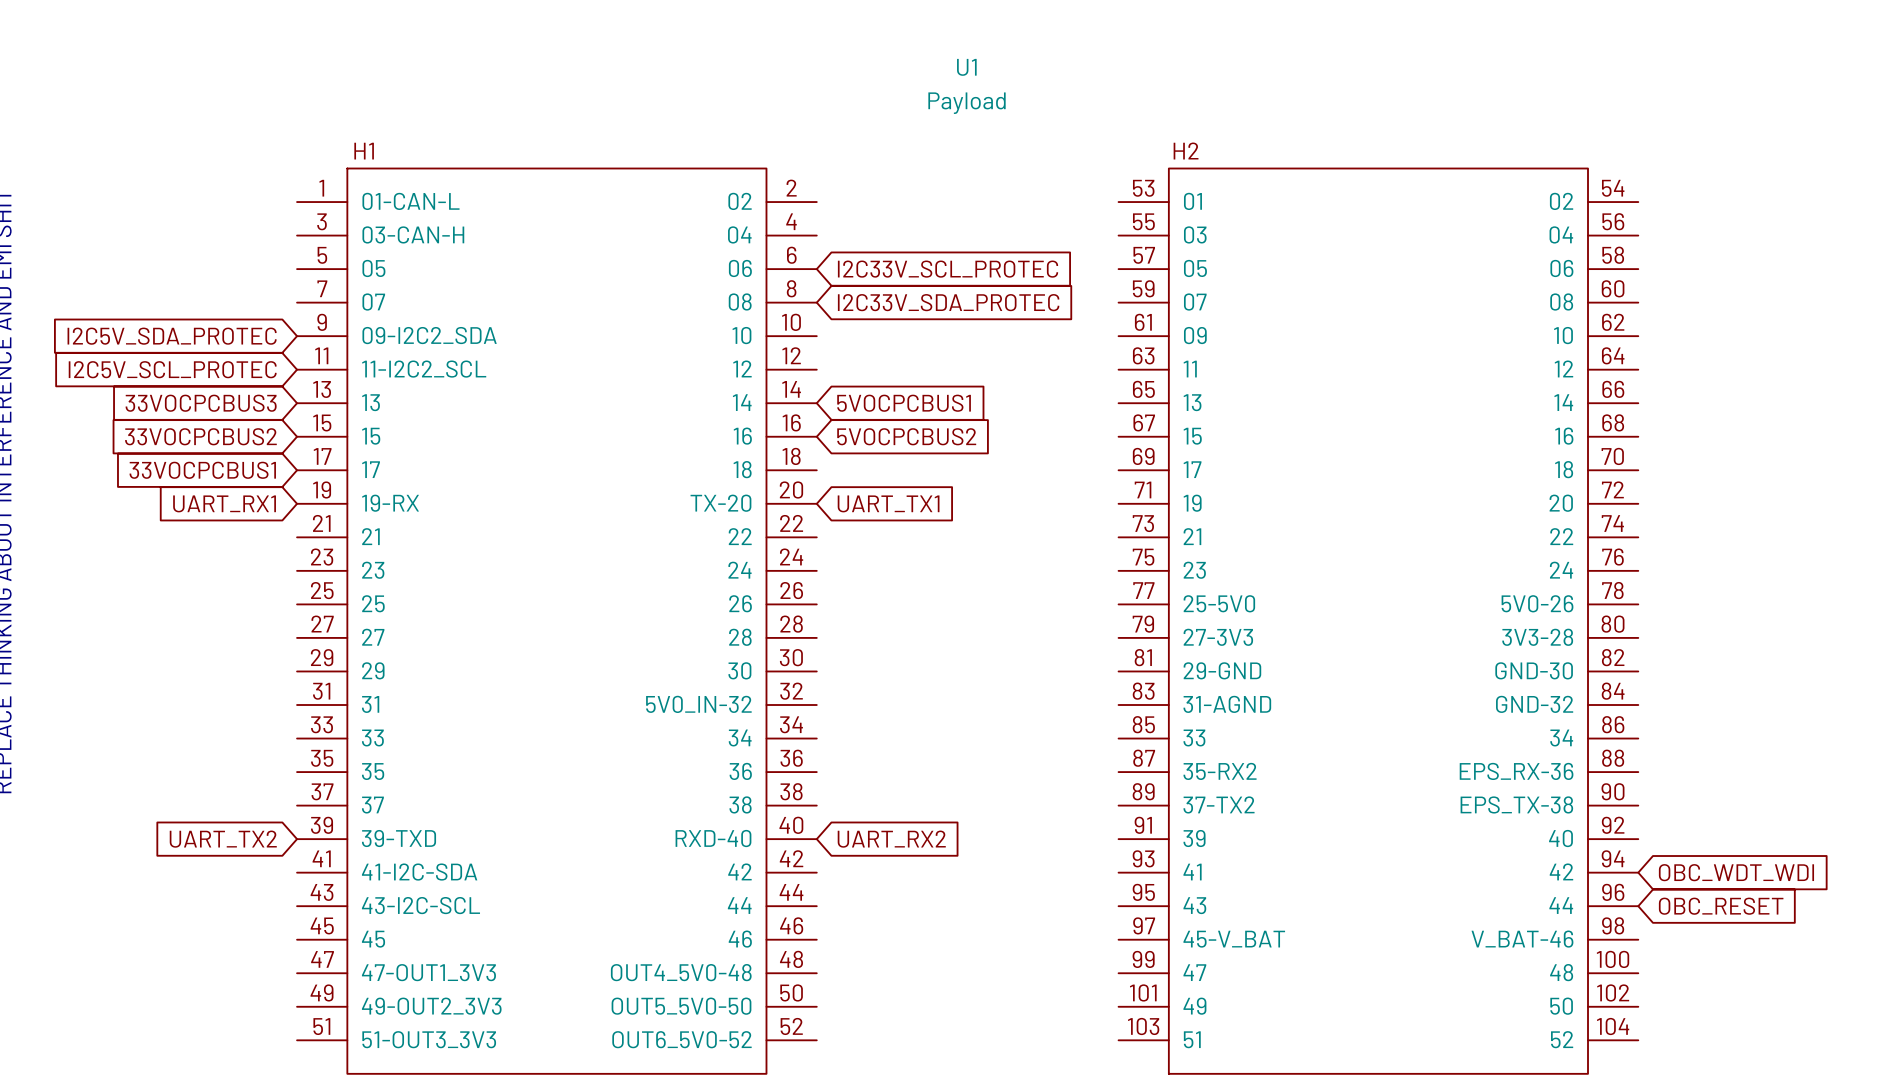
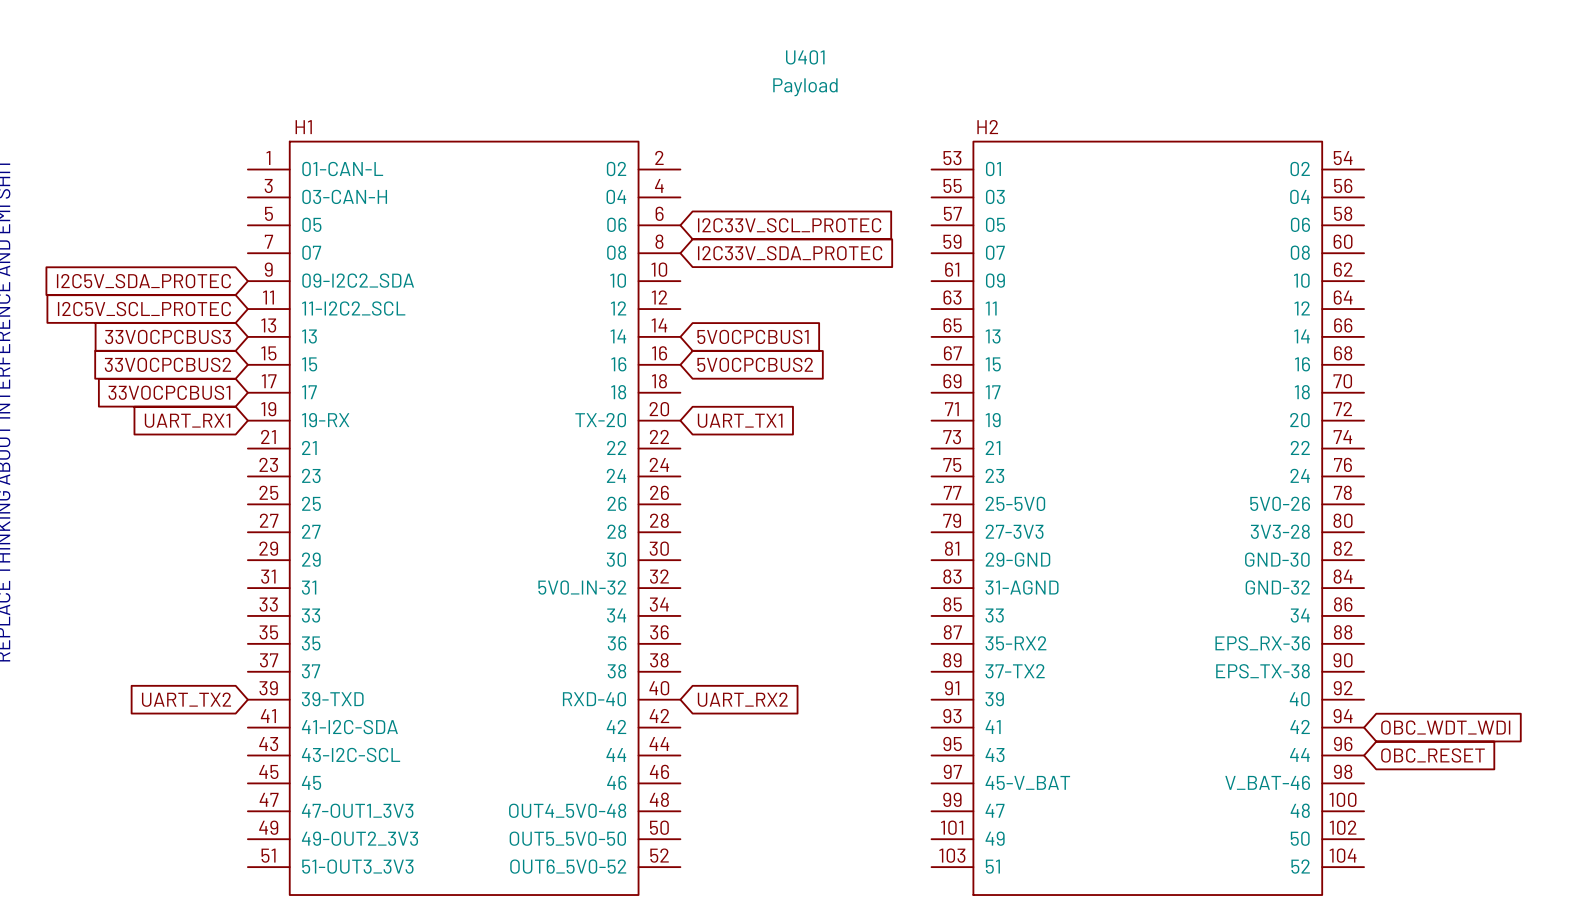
U1 name: U1 (966, 67) -> U401 (805, 57)

